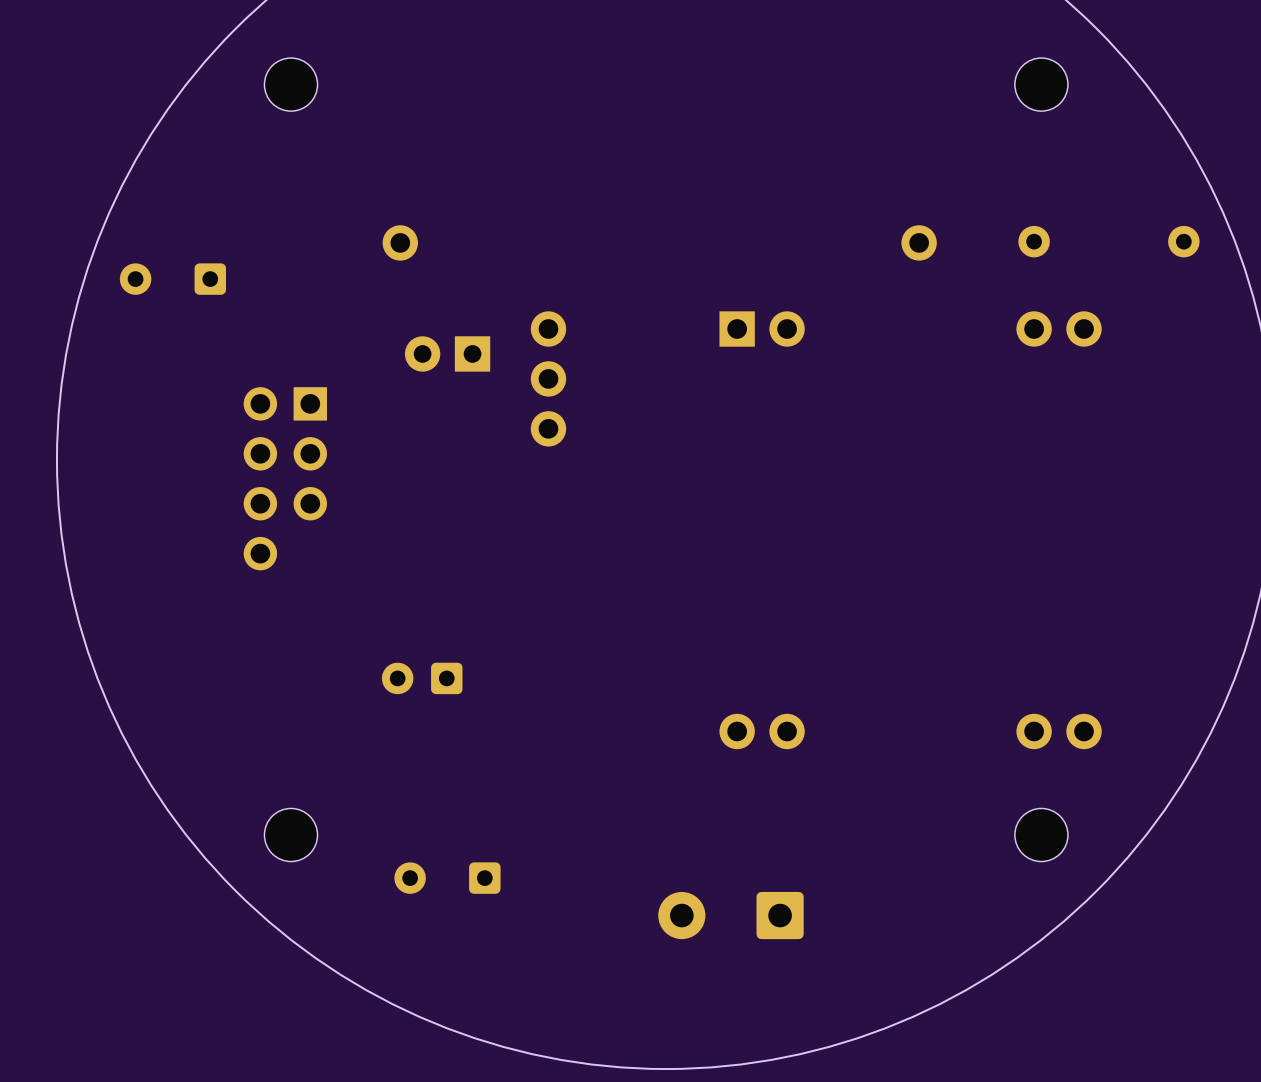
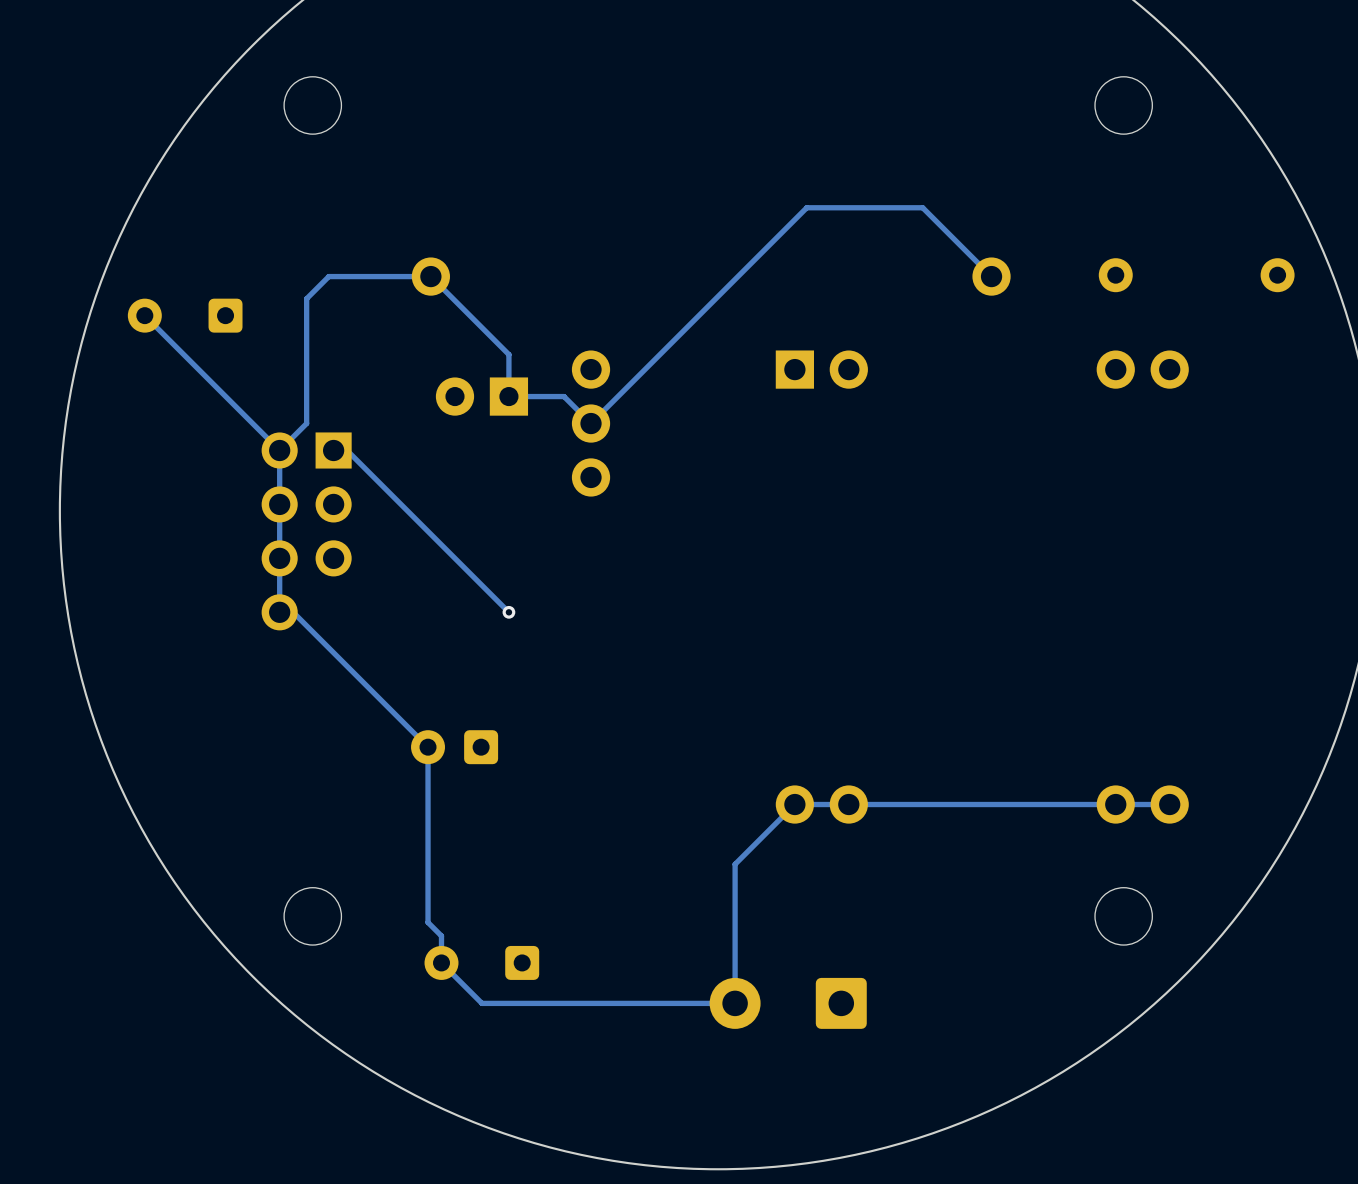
track: none -> (991, 276) (922, 207) (806, 207) (591, 423) (564, 396) (508, 396) (508, 354) (430, 276) (328, 276) (306, 298) (306, 423) (279, 450)
track: none -> (144, 315) (279, 450)
track: none -> (279, 450) (279, 612) (293, 612) (428, 747) (428, 922) (441, 935) (441, 962) (481, 1003) (735, 1003) (735, 864) (794, 804) (1169, 804)
track: none -> (333, 450) (347, 450) (508, 612)
via: none -> (508, 612)

